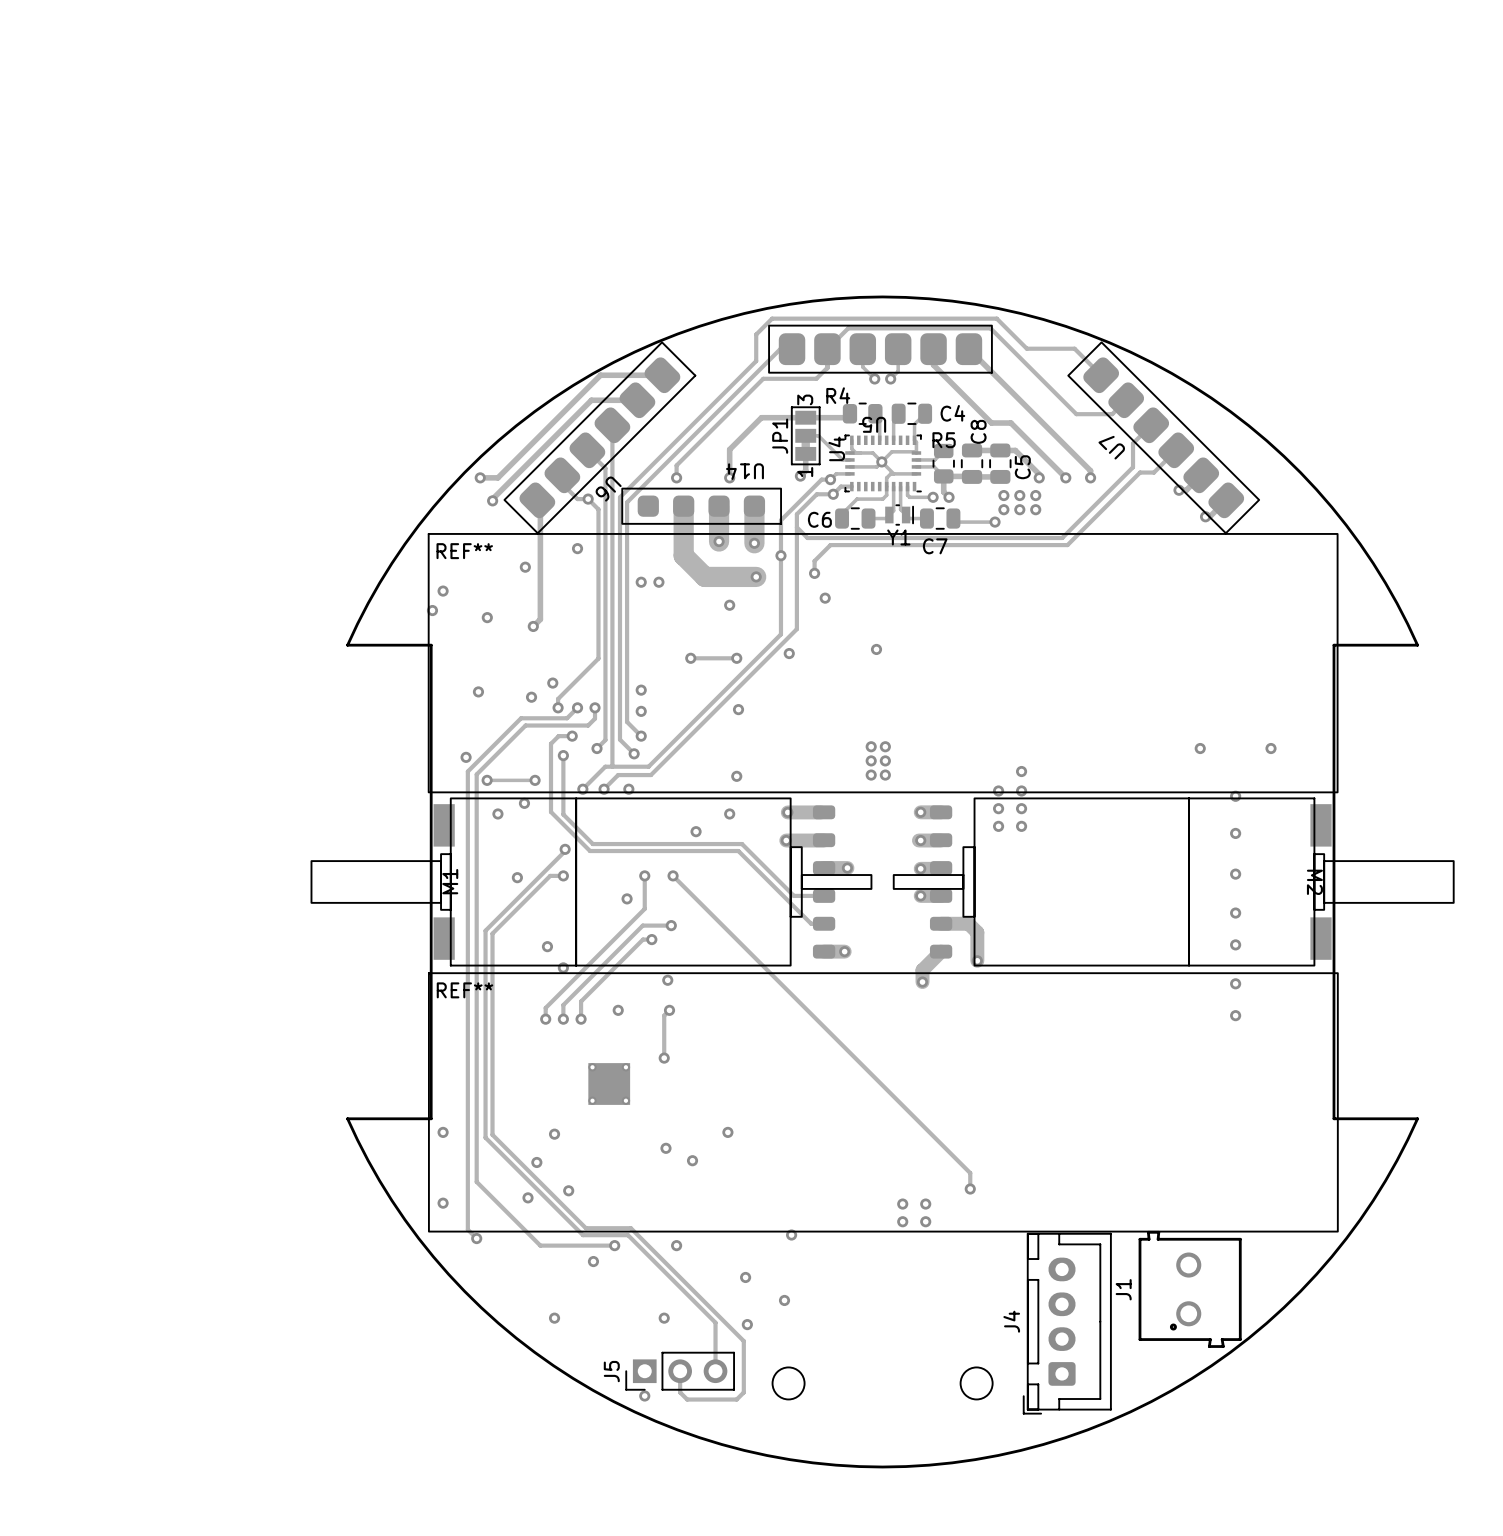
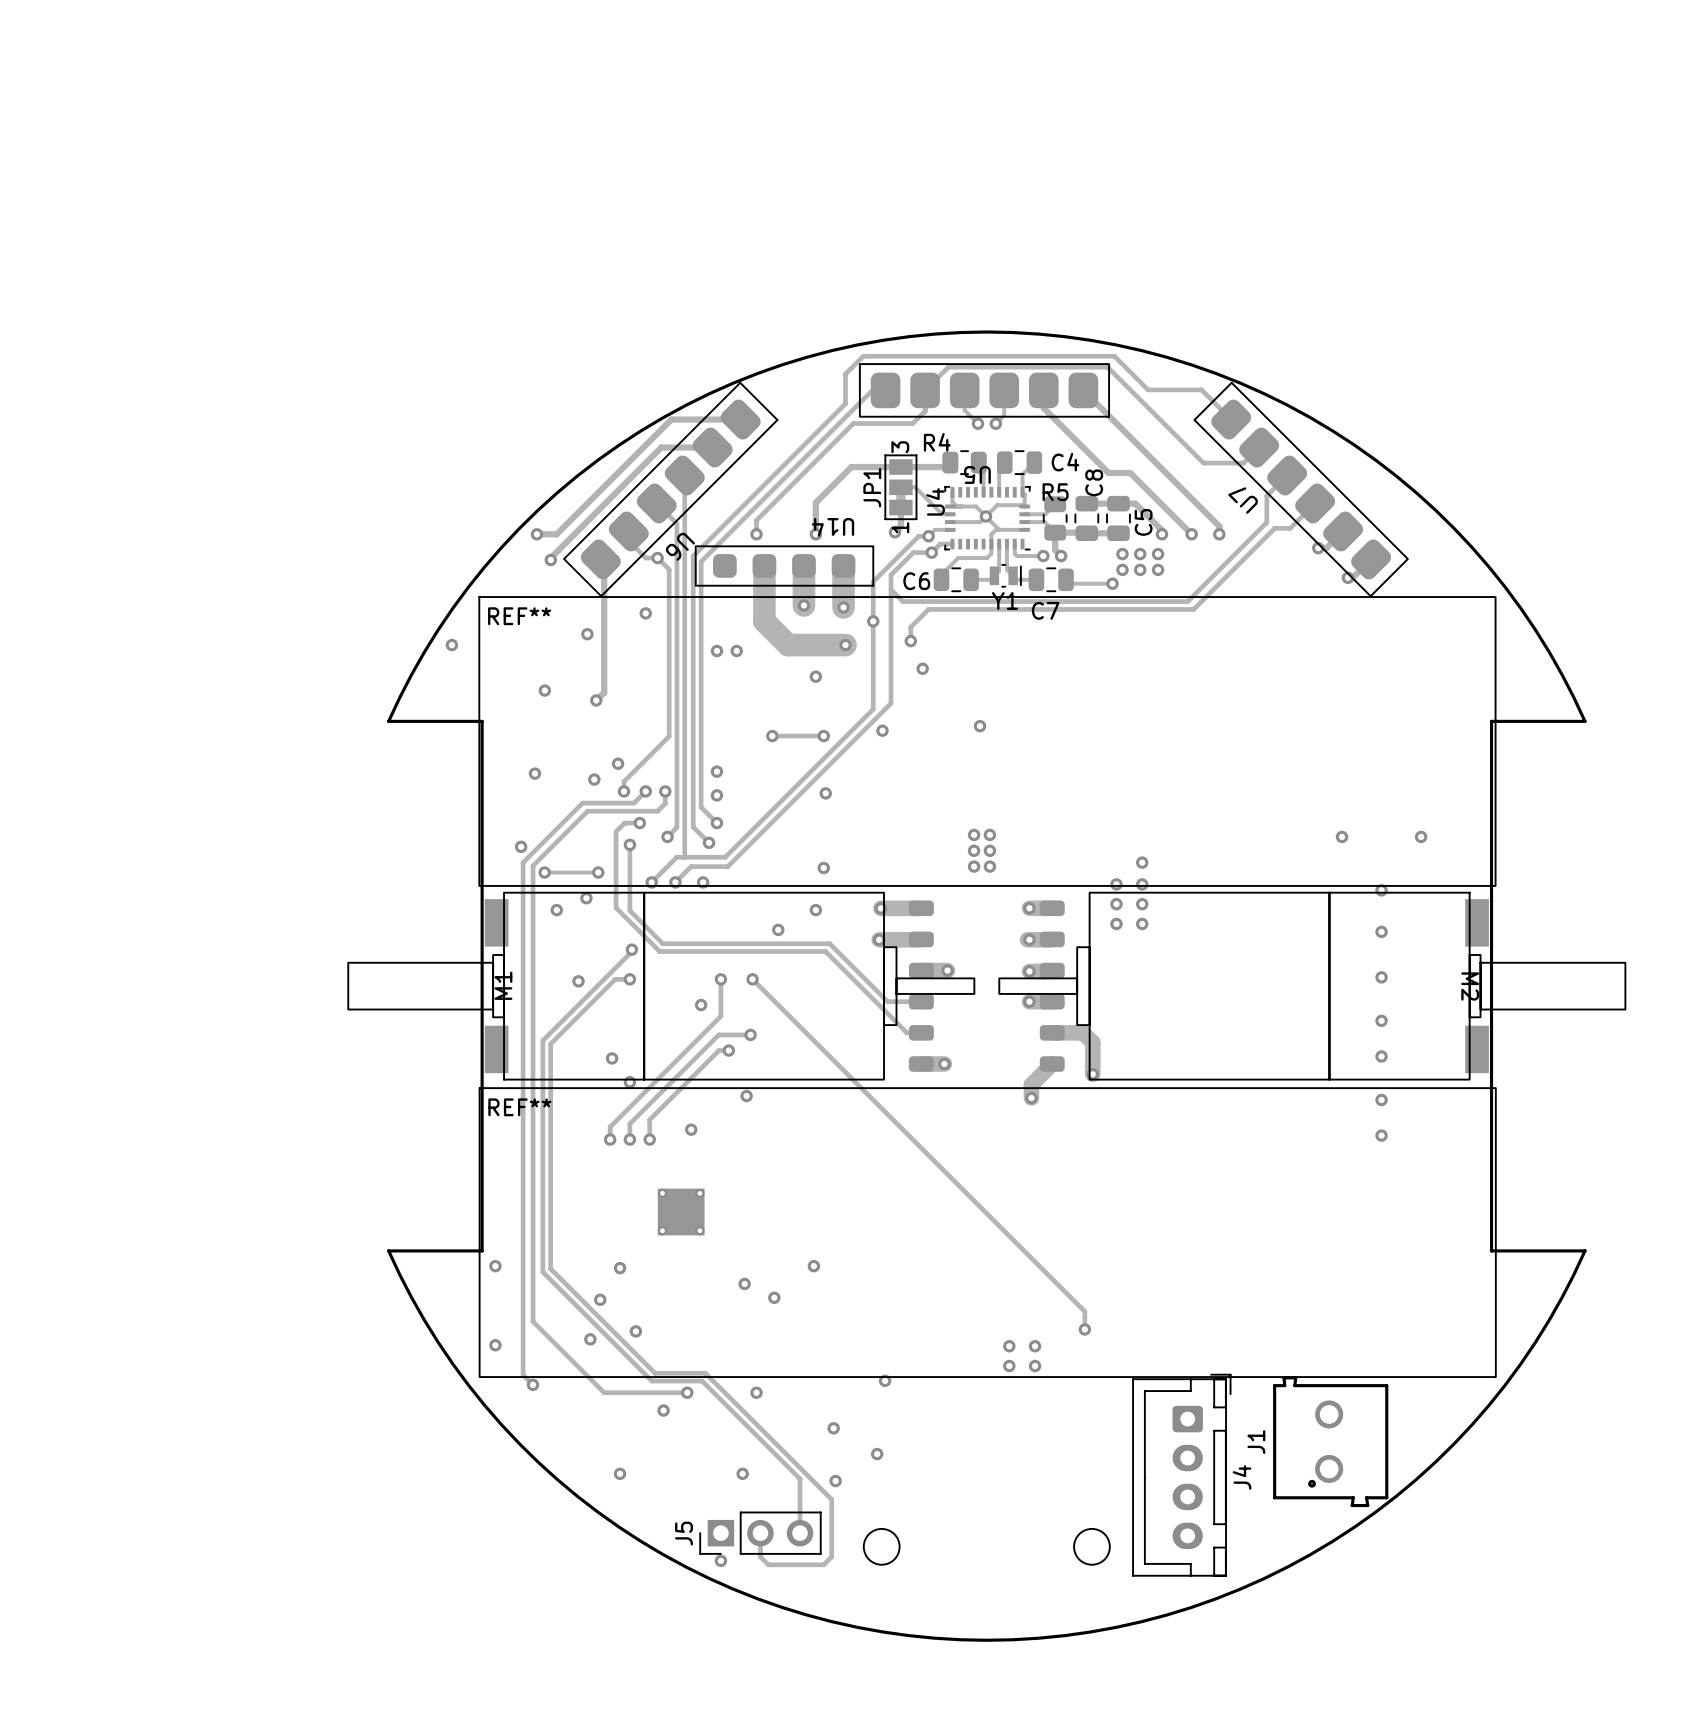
via: none -> (451, 645)
via: (443, 591) -> none
via: (432, 610) -> none
track: (669, 1010) (664, 1015) (664, 1058) -> none
via: (669, 1010) -> none
via: (664, 1058) -> none
J4 rotation: 0° (1067, 1323) -> 180° (1181, 1475)

